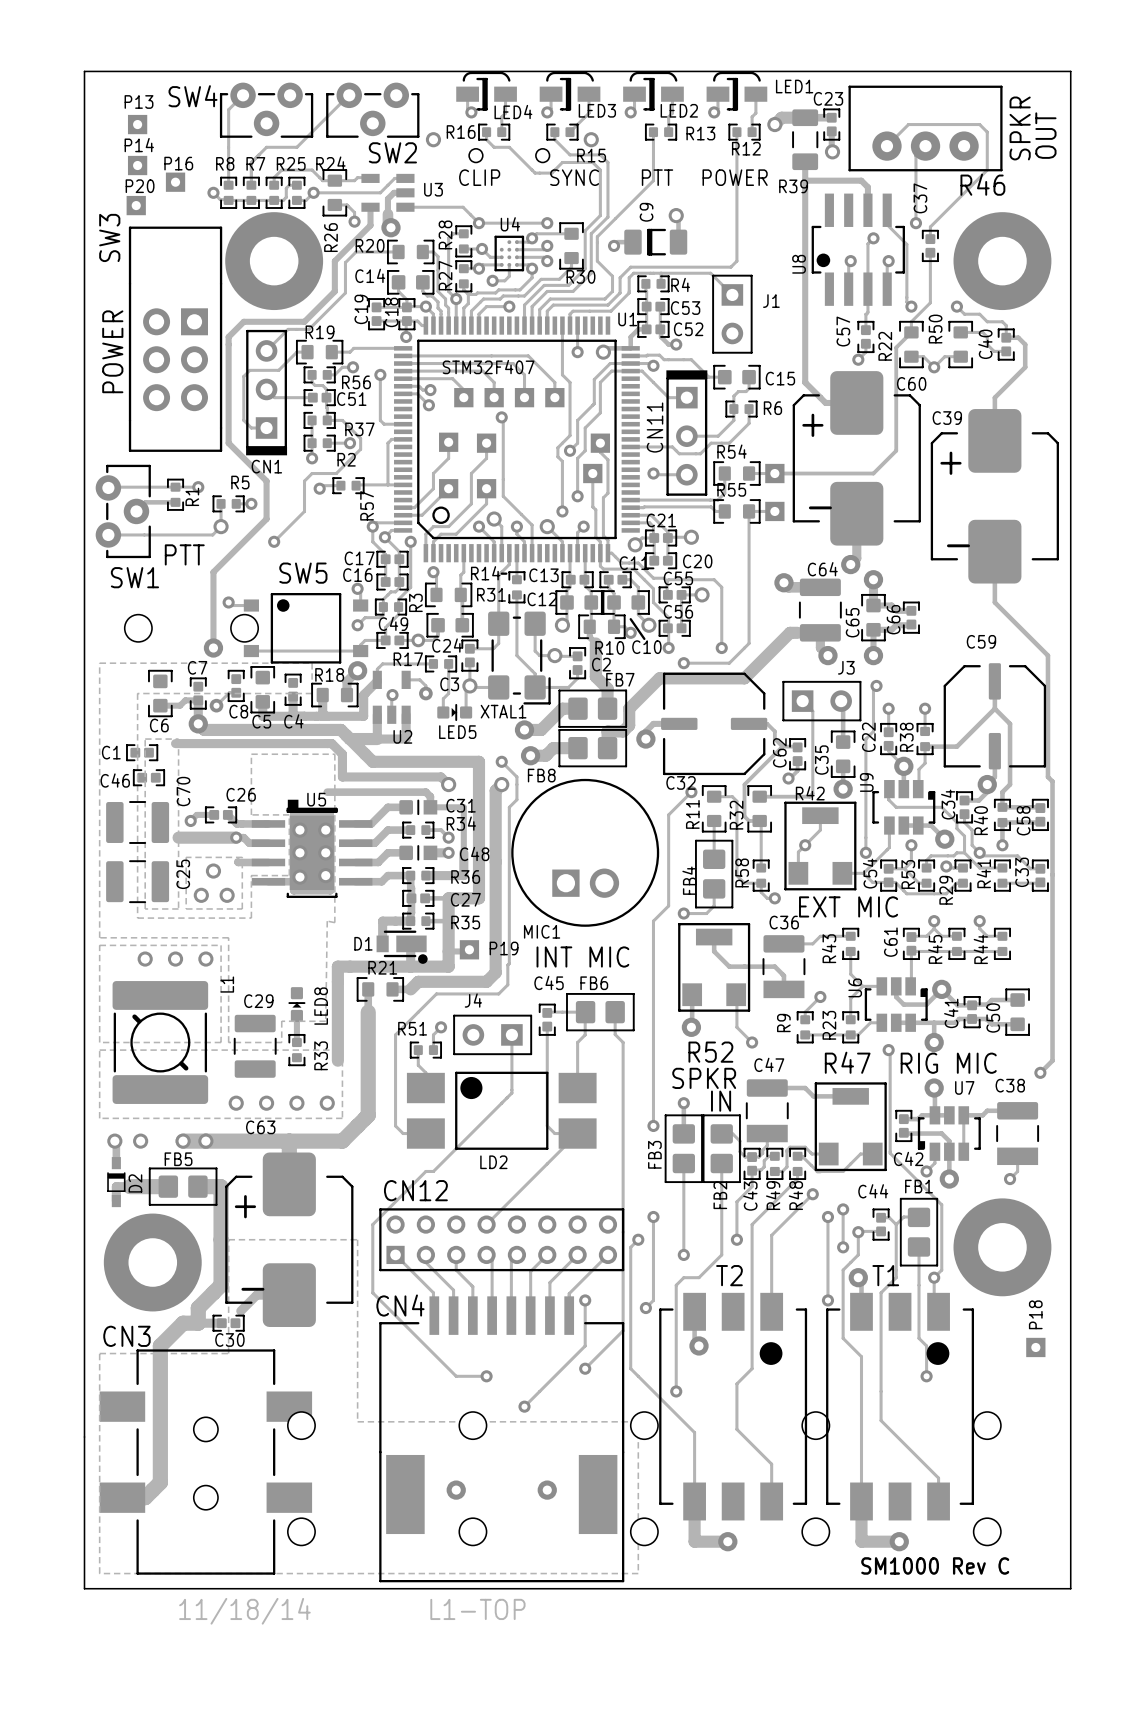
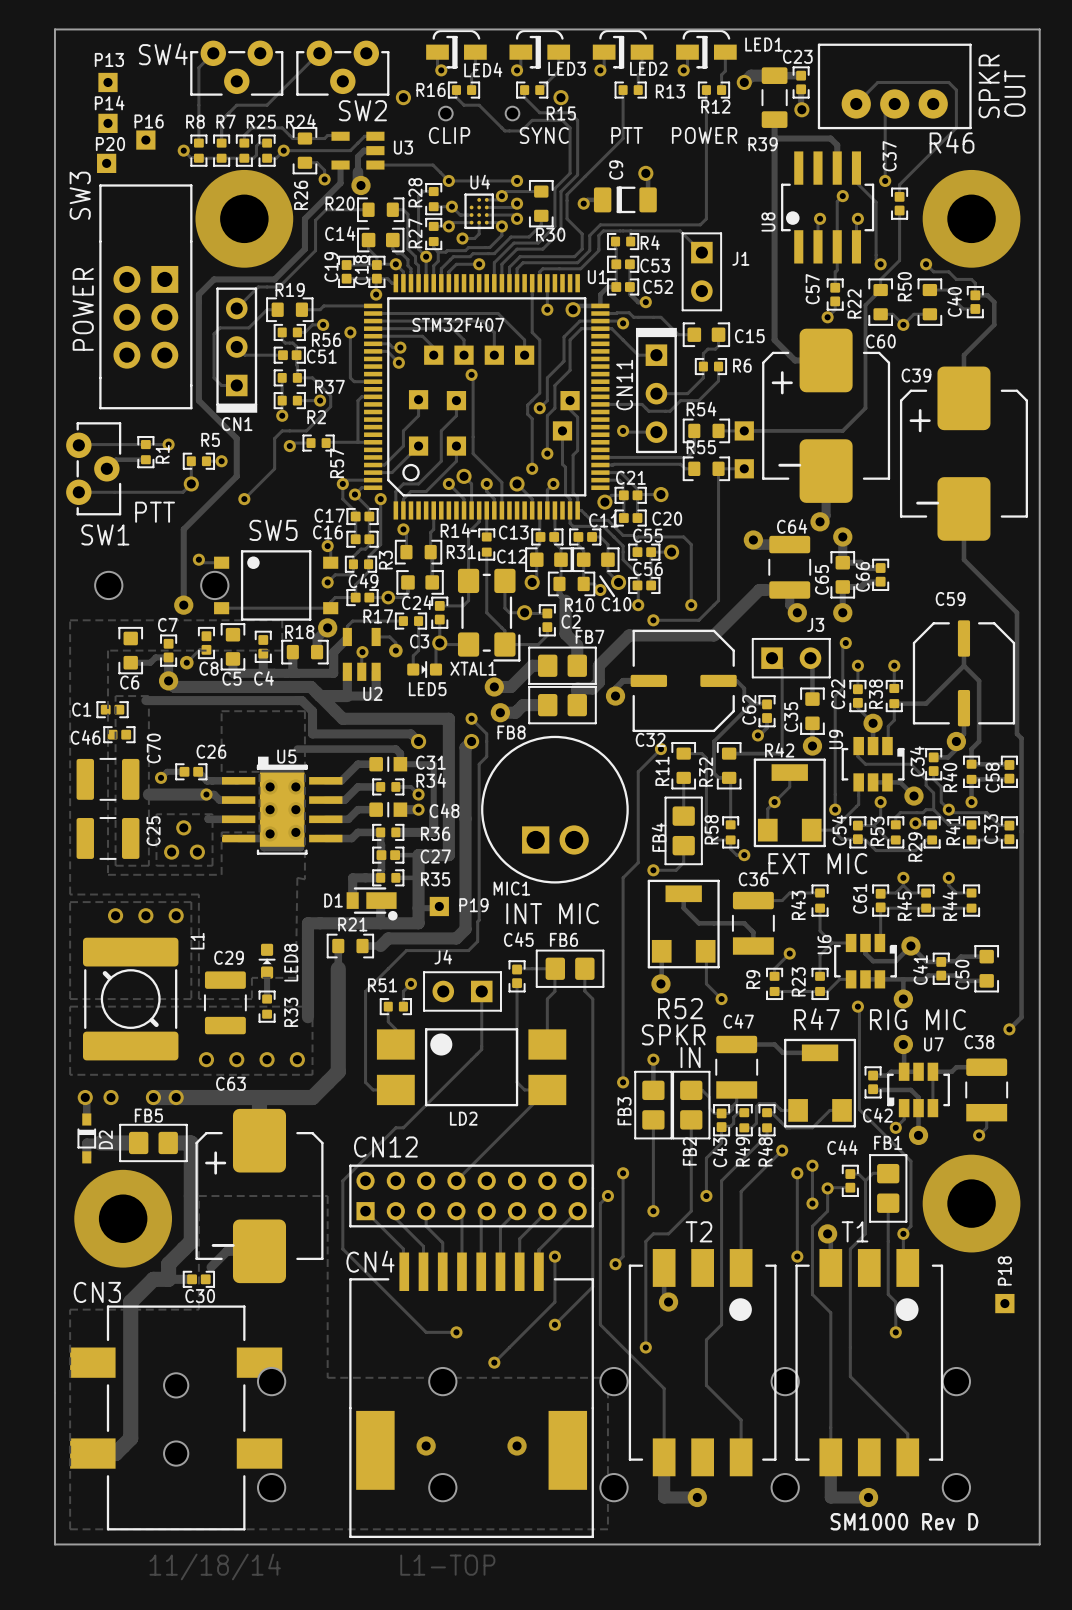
text: SM1000 Rev C (935, 1565) -> none
text: none -> SM1000 Rev D (904, 1521)

